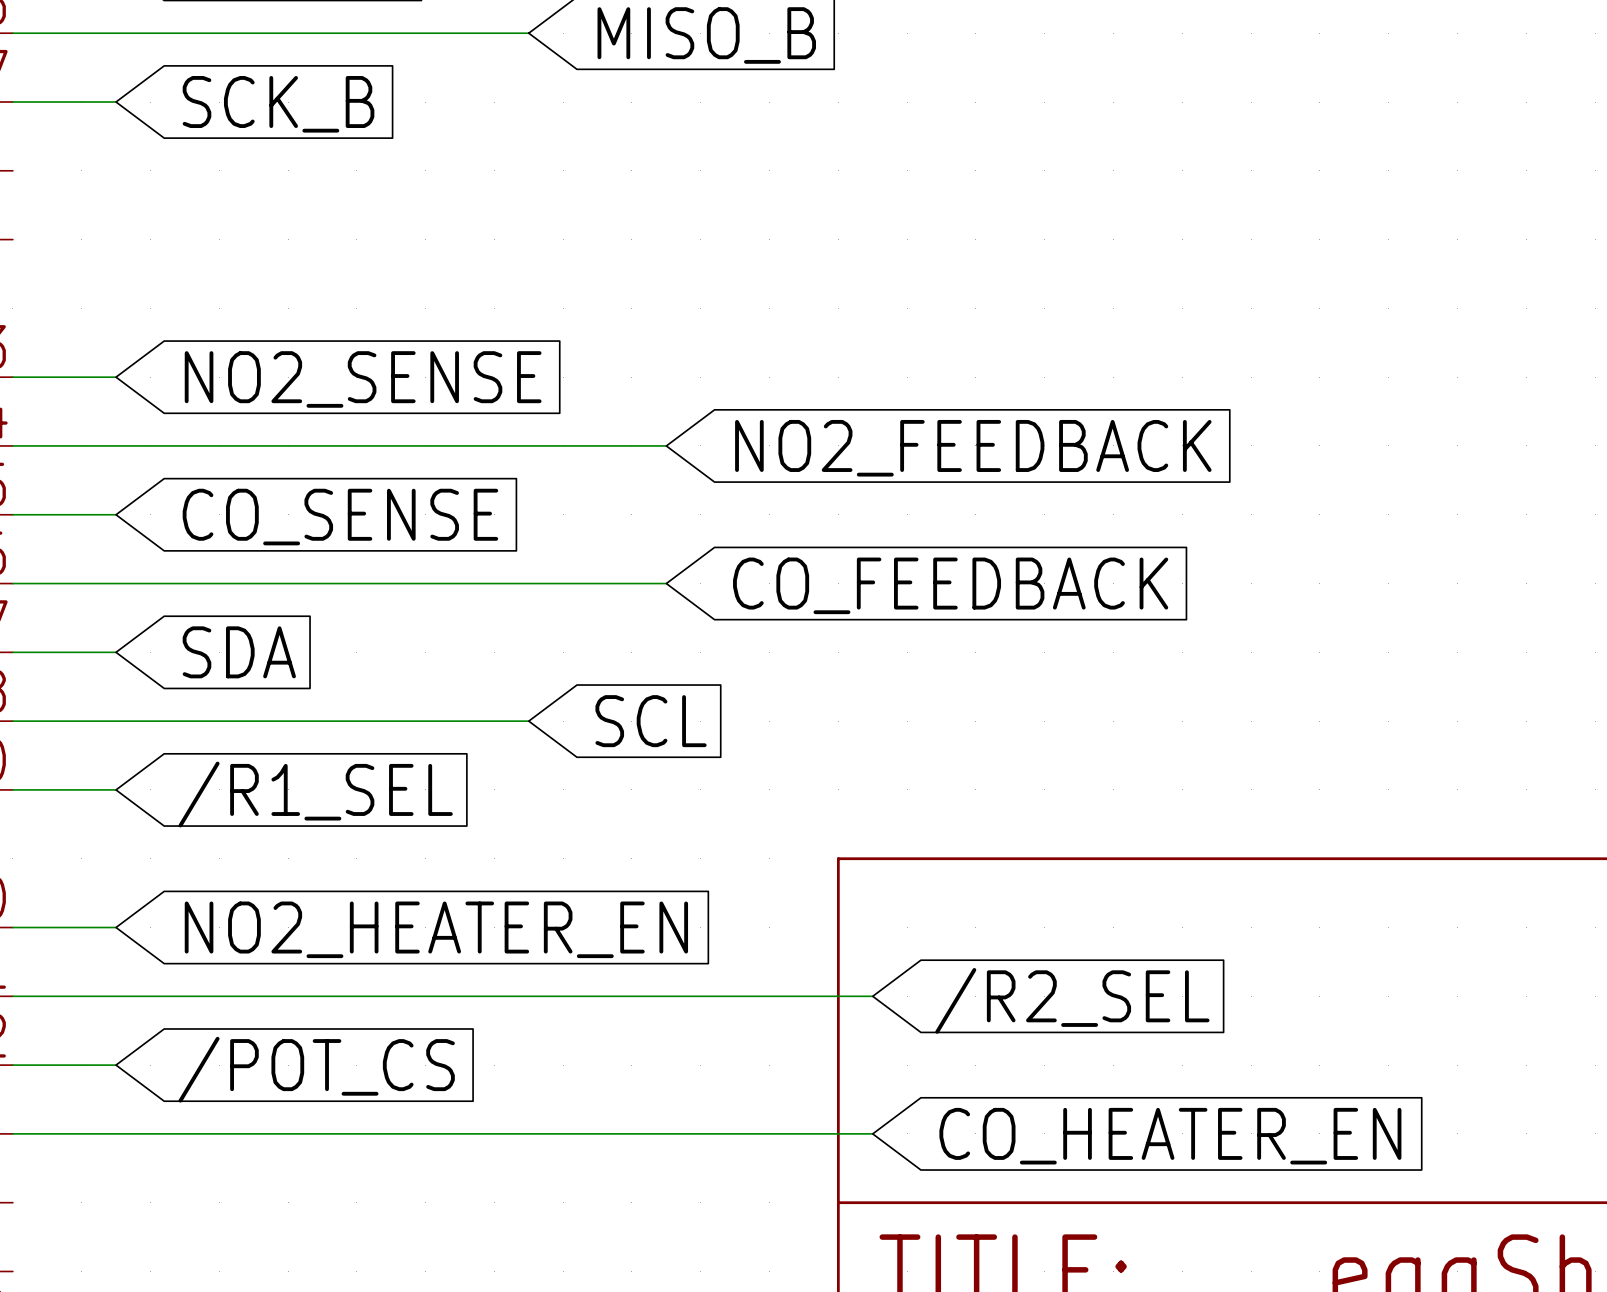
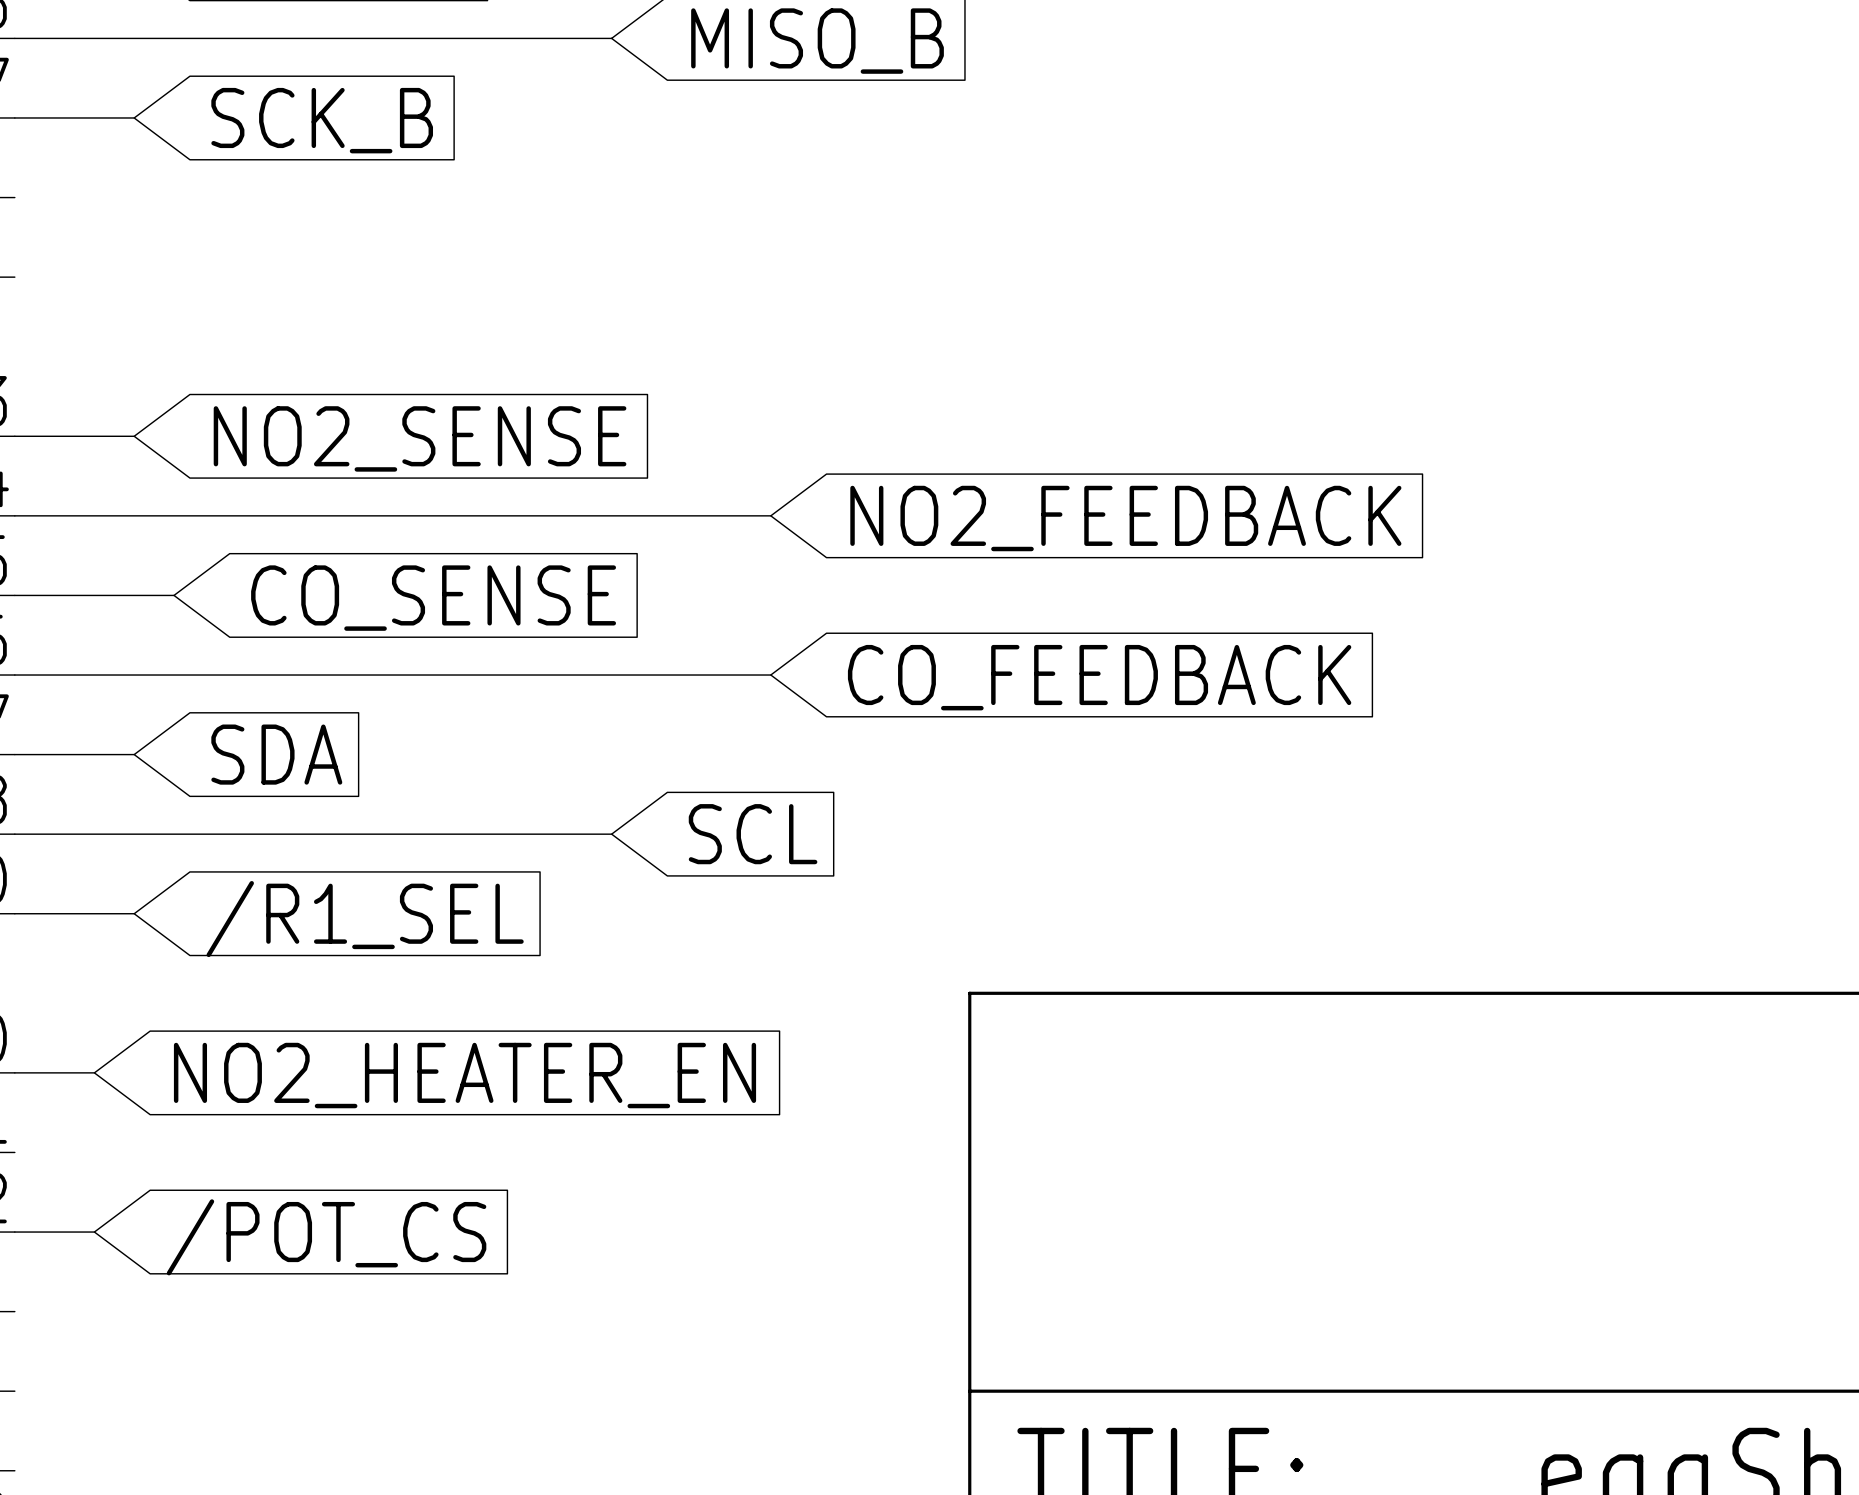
global label position: CO_SENSE (340, 517) -> CO_SENSE (433, 598)
wire: (81, 927) (116, 927) -> (134, 595) (174, 595)
global label position: NO2_HEATER_EN (436, 929) -> NO2_HEATER_EN (465, 1075)
wire: (12, 996) (872, 996) -> none
global label: /R2_SEL (1072, 1000) -> none
wire: (81, 1065) (116, 1065) -> none
global label position: /POT_CS (316, 1069) -> /POT_CS (326, 1237)
wire: (12, 1133) (872, 1133) -> none
global label: CO_HEATER_EN (1170, 1136) -> none

